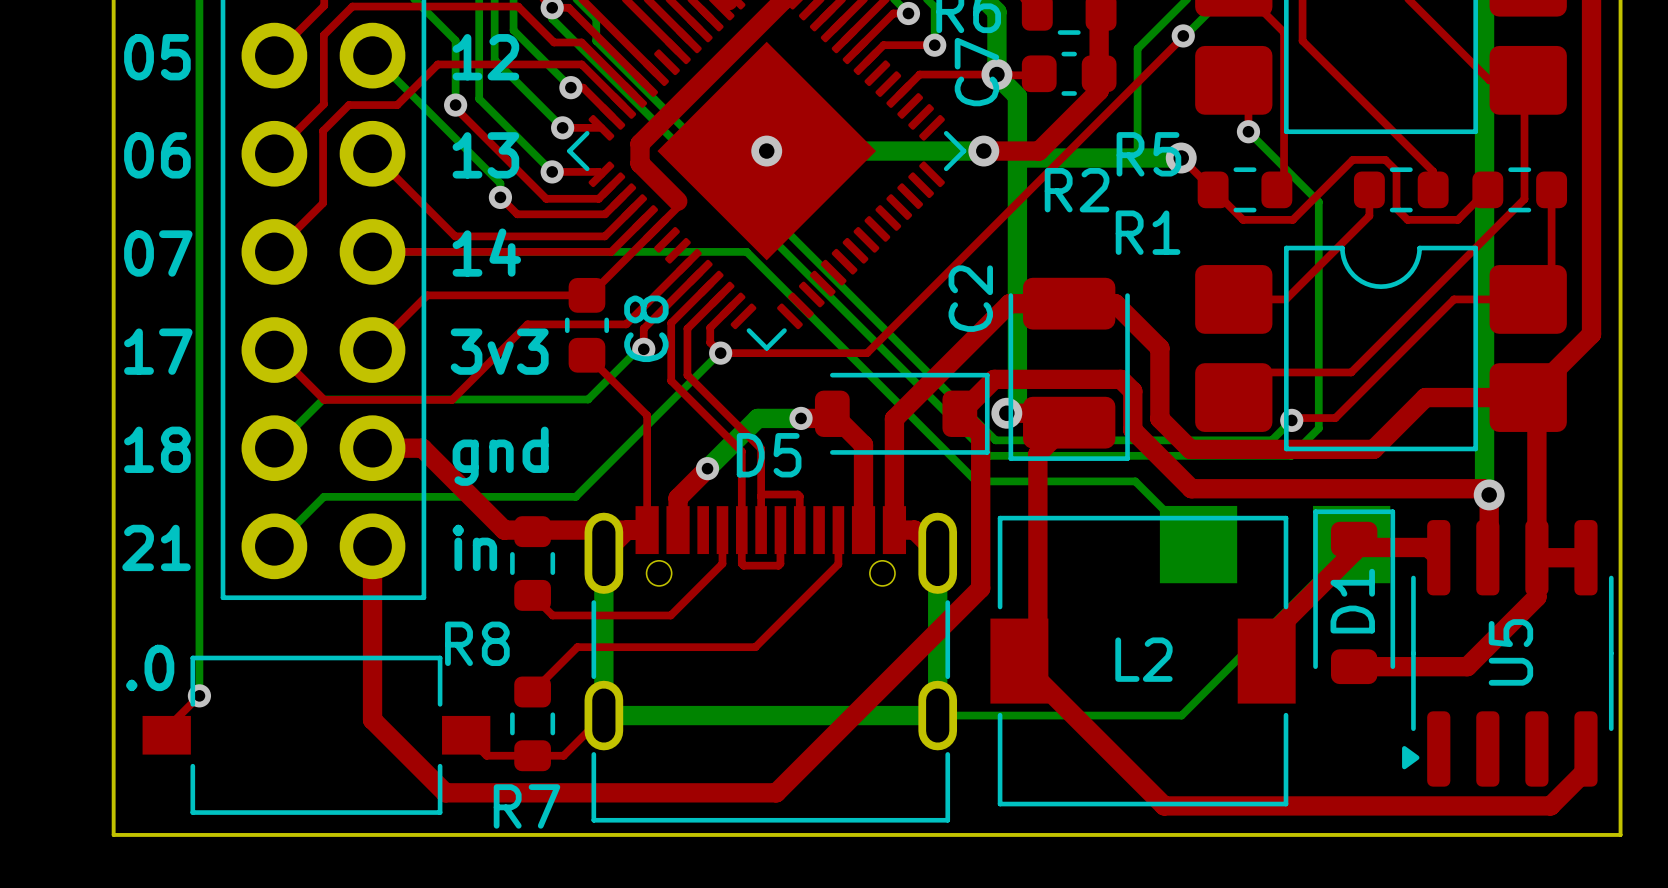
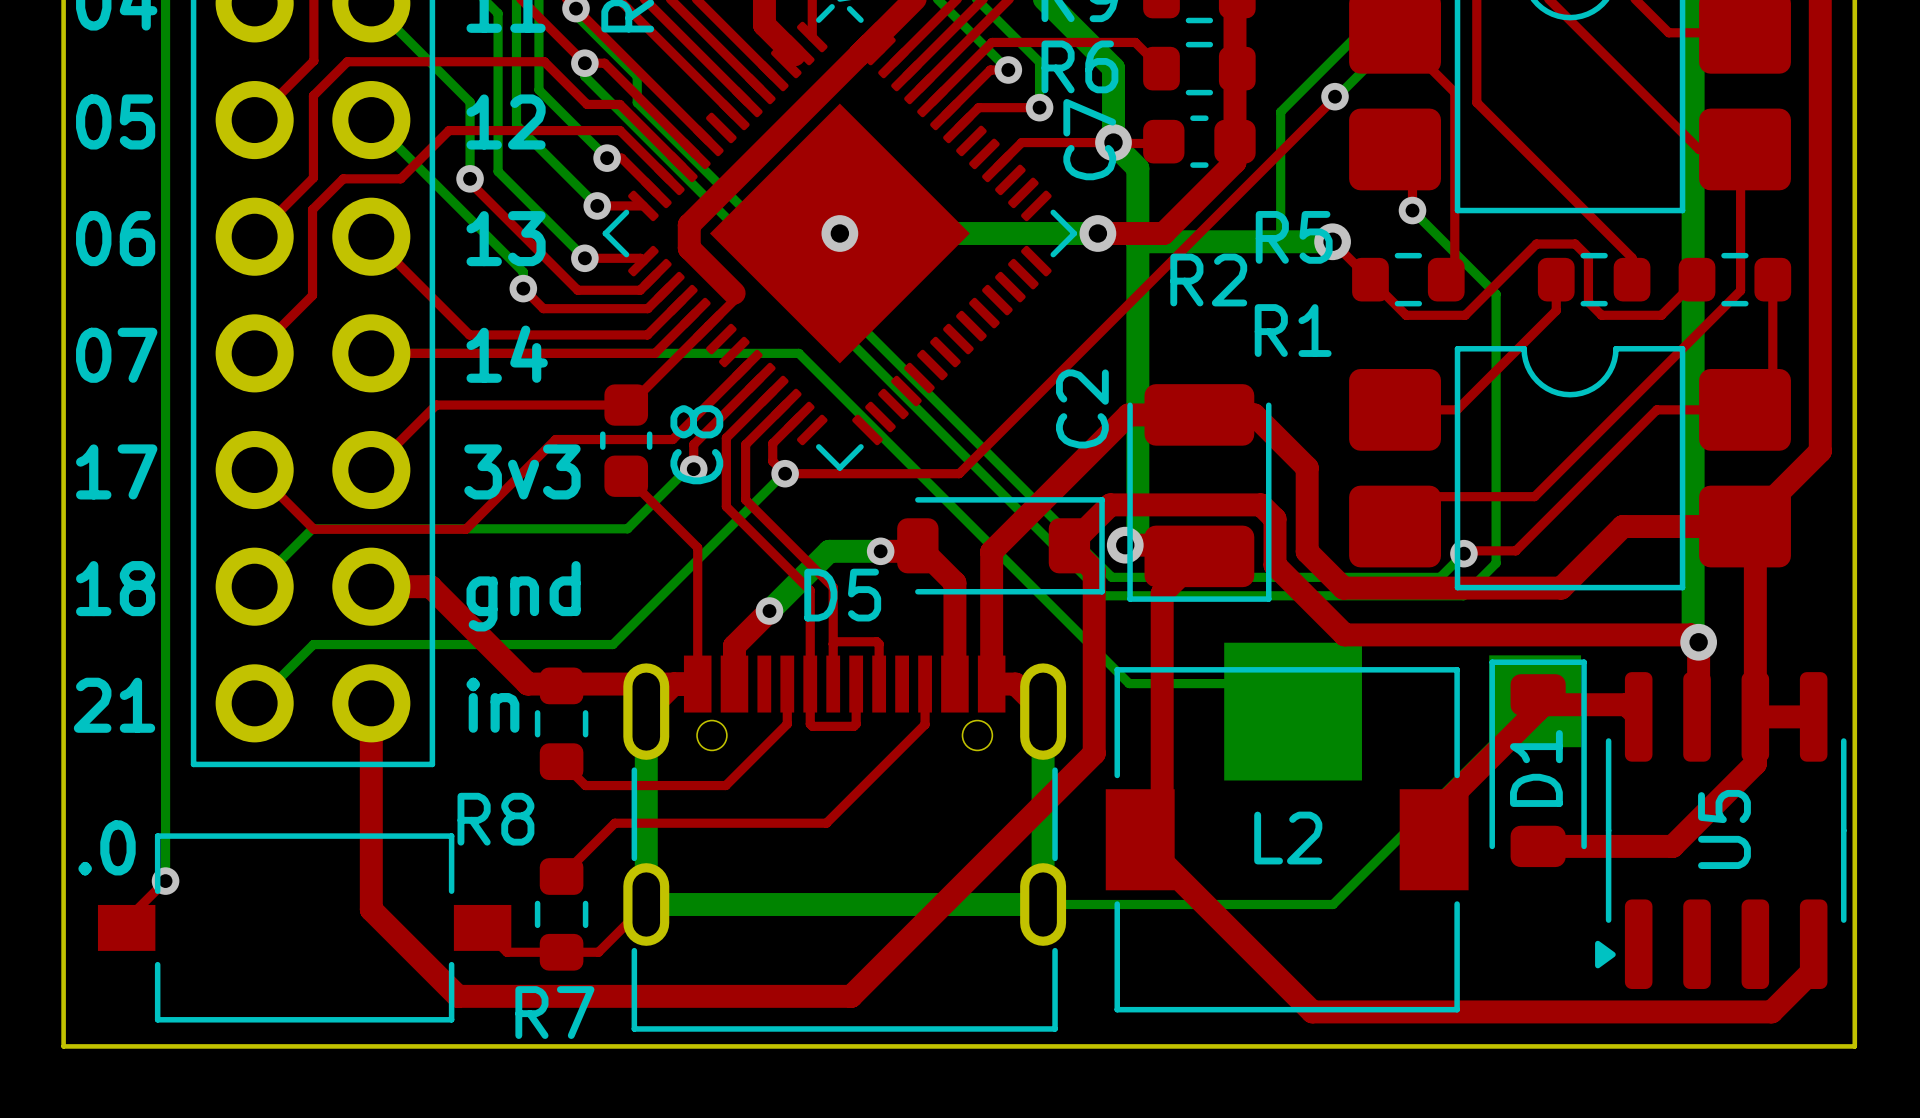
bottom track: (732, 251) (746, 251) (976, 481) (1135, 481) (1198, 544) -> (798, 353) (1129, 683) (1265, 683) (1293, 711)
part: (1198, 544) -> none
part: none -> (1293, 711)

